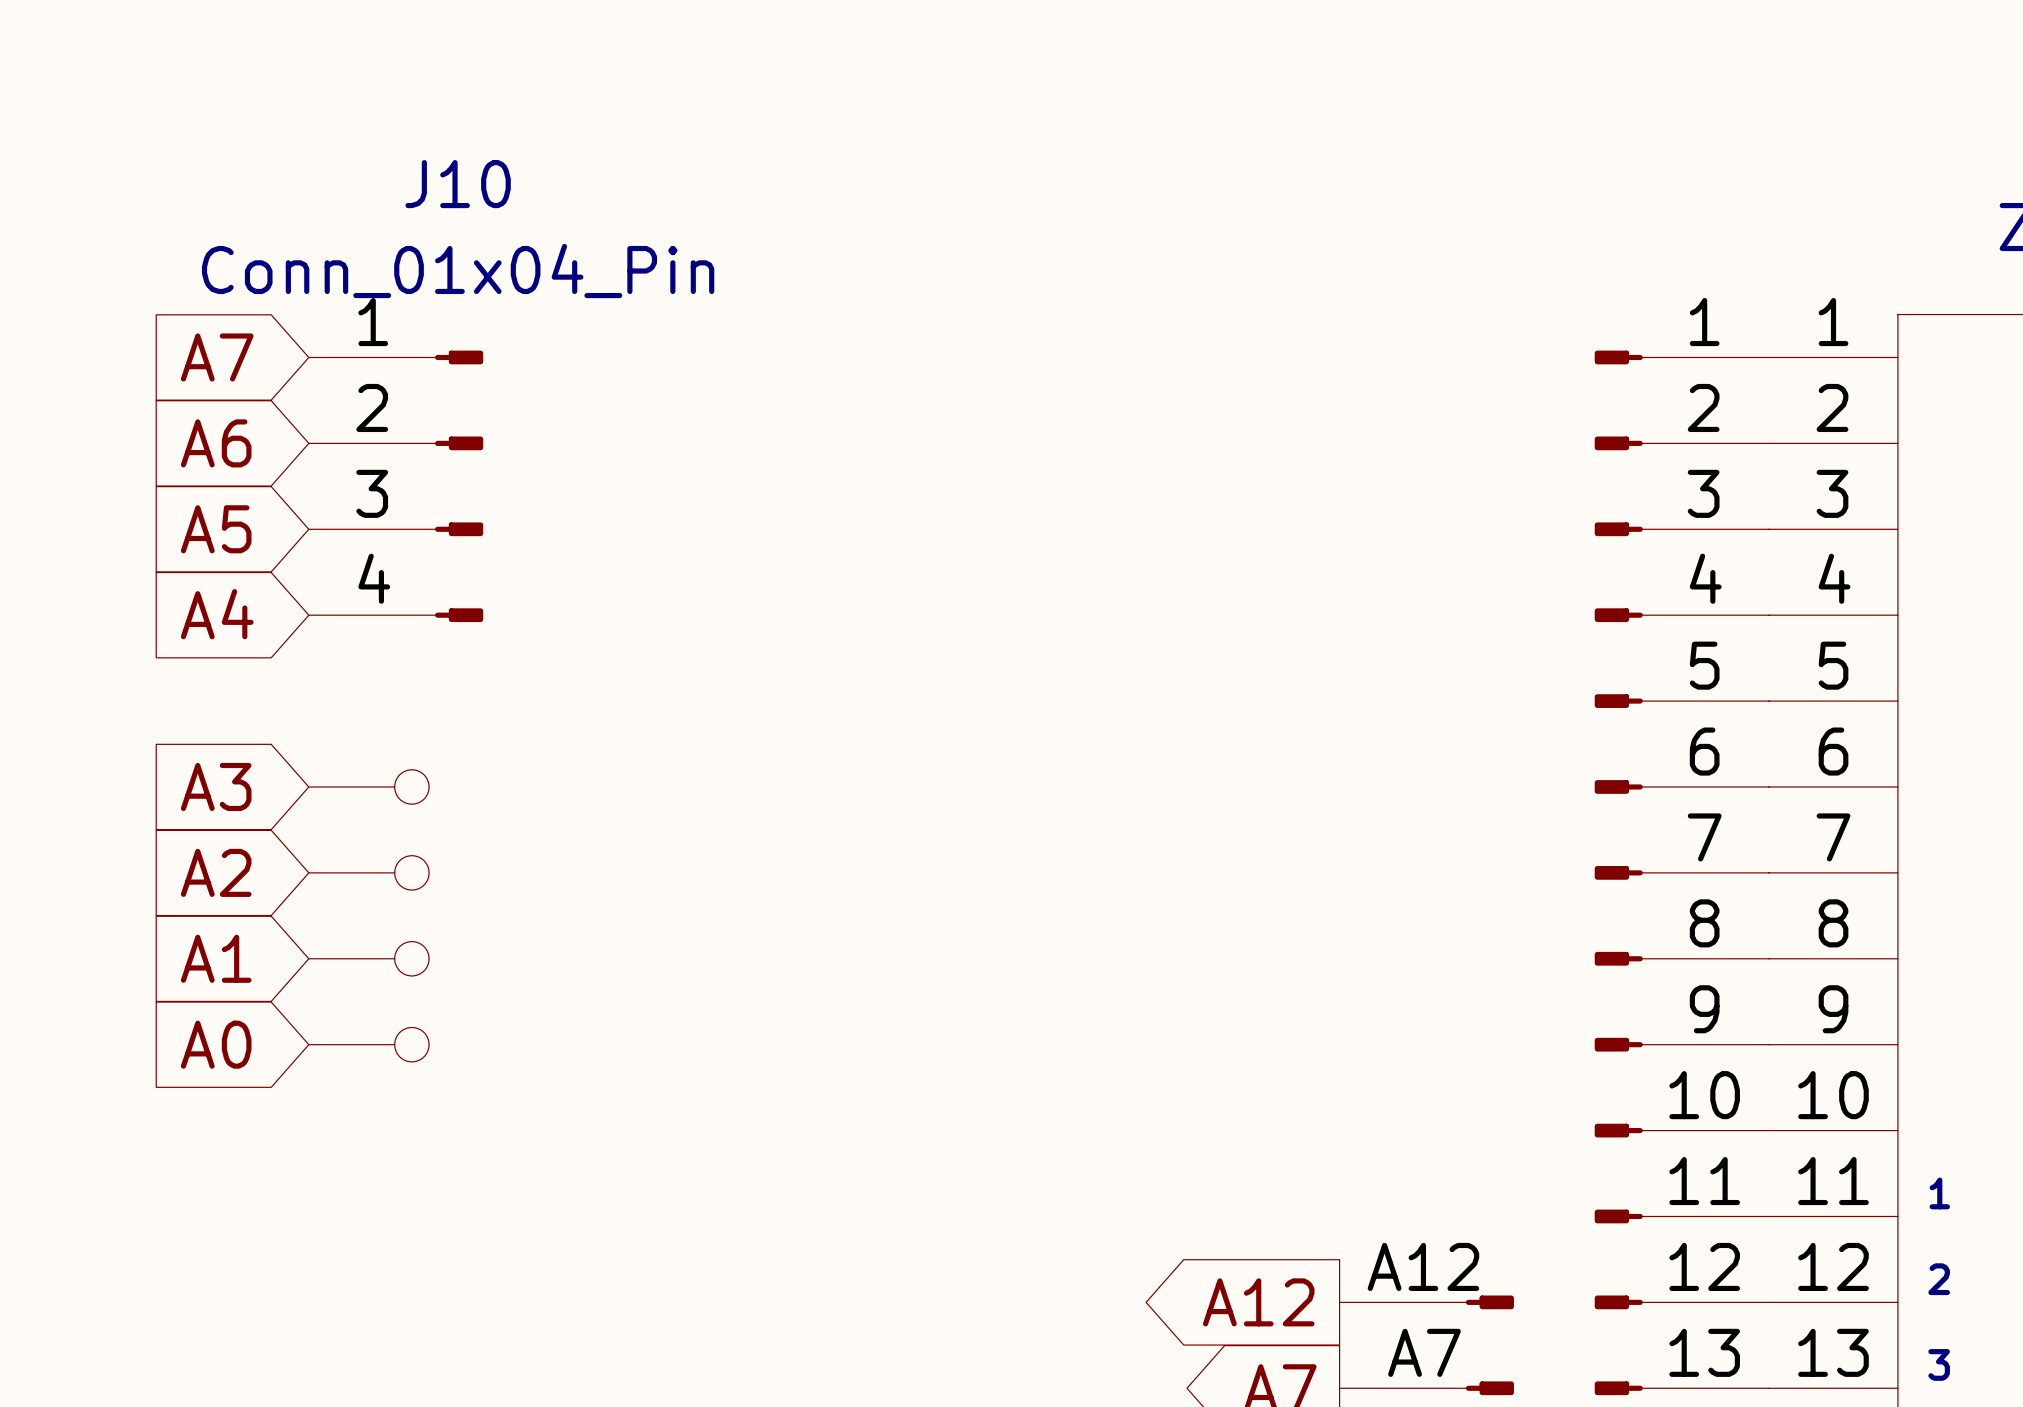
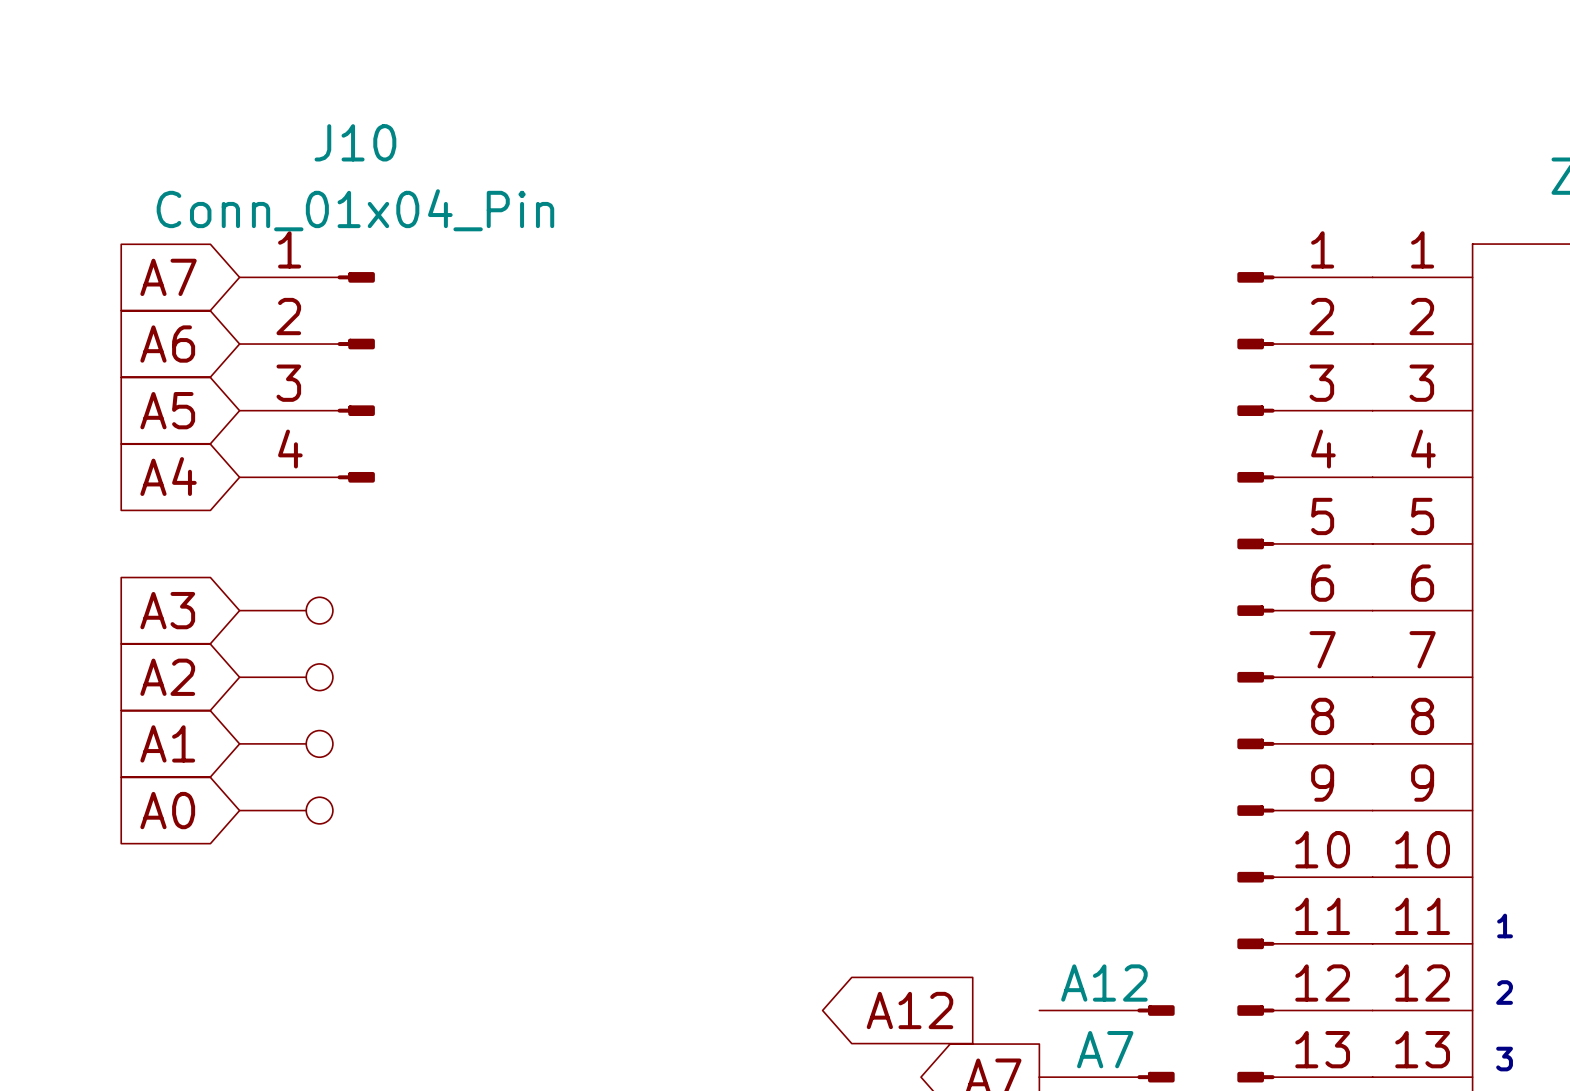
global label position: A12 (1258, 1302) -> A12 (909, 1010)

